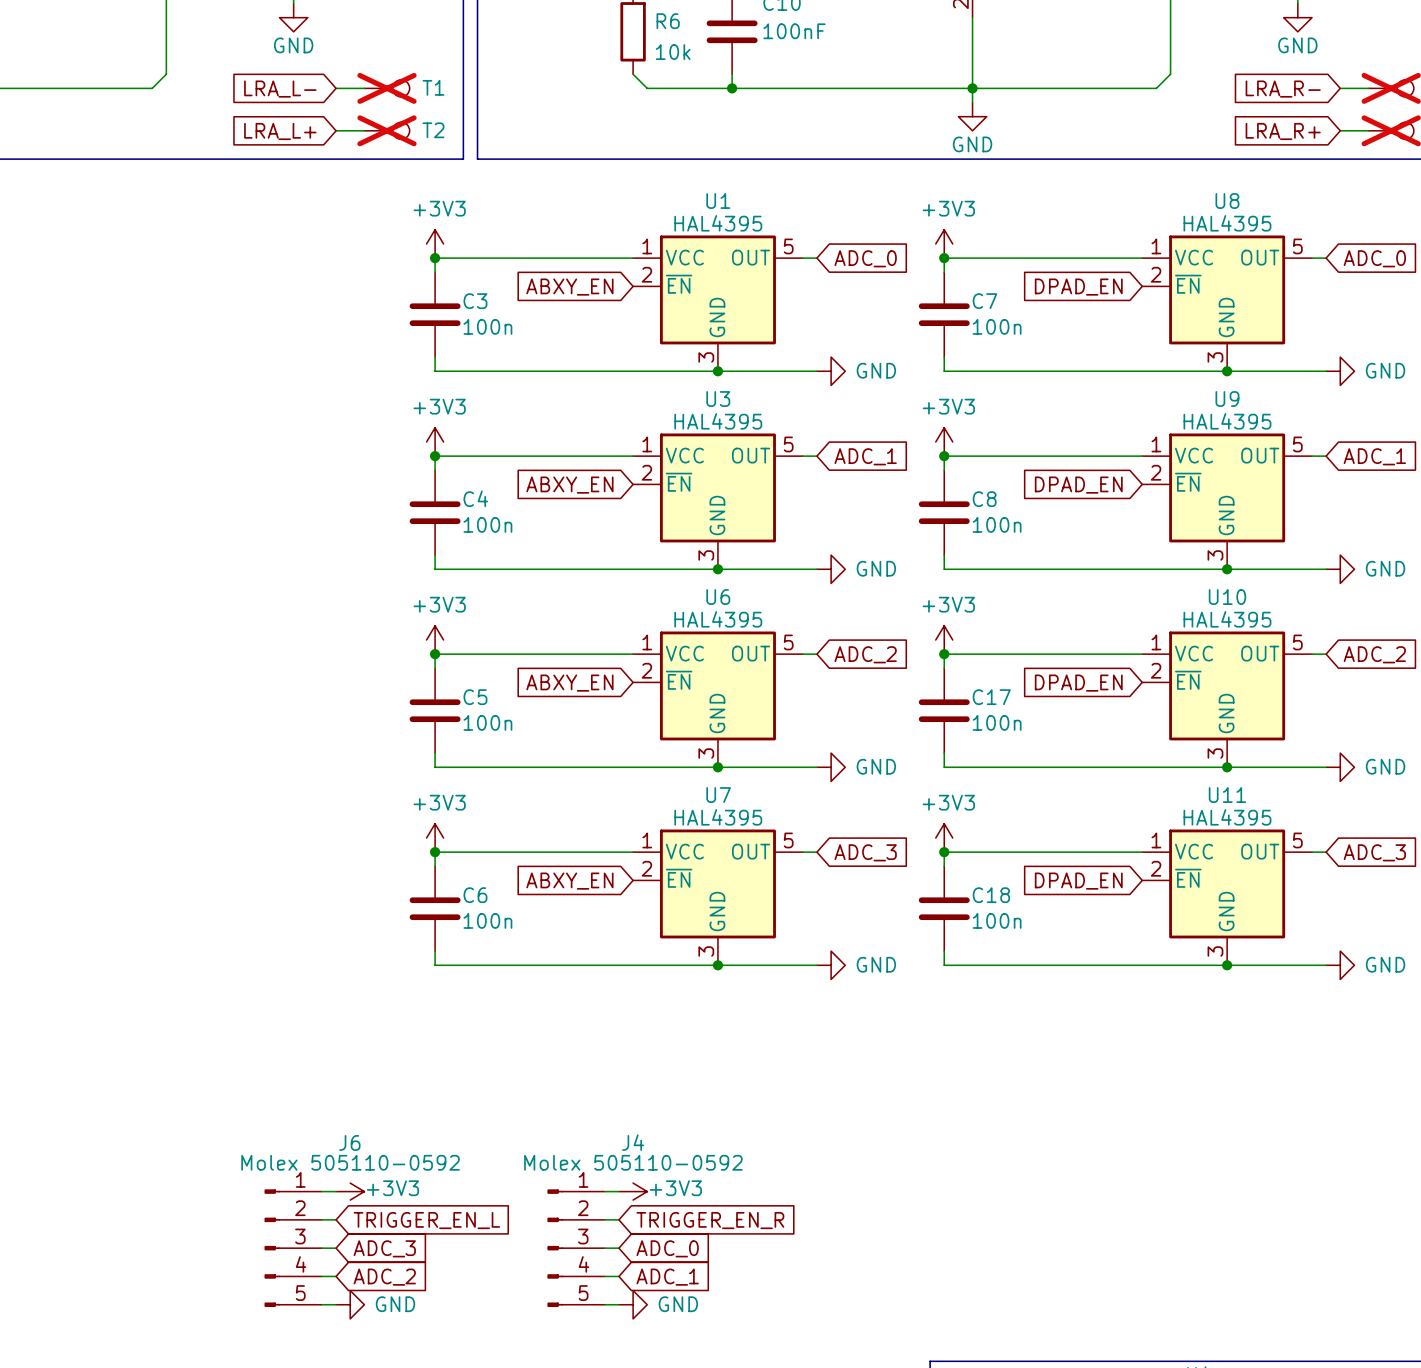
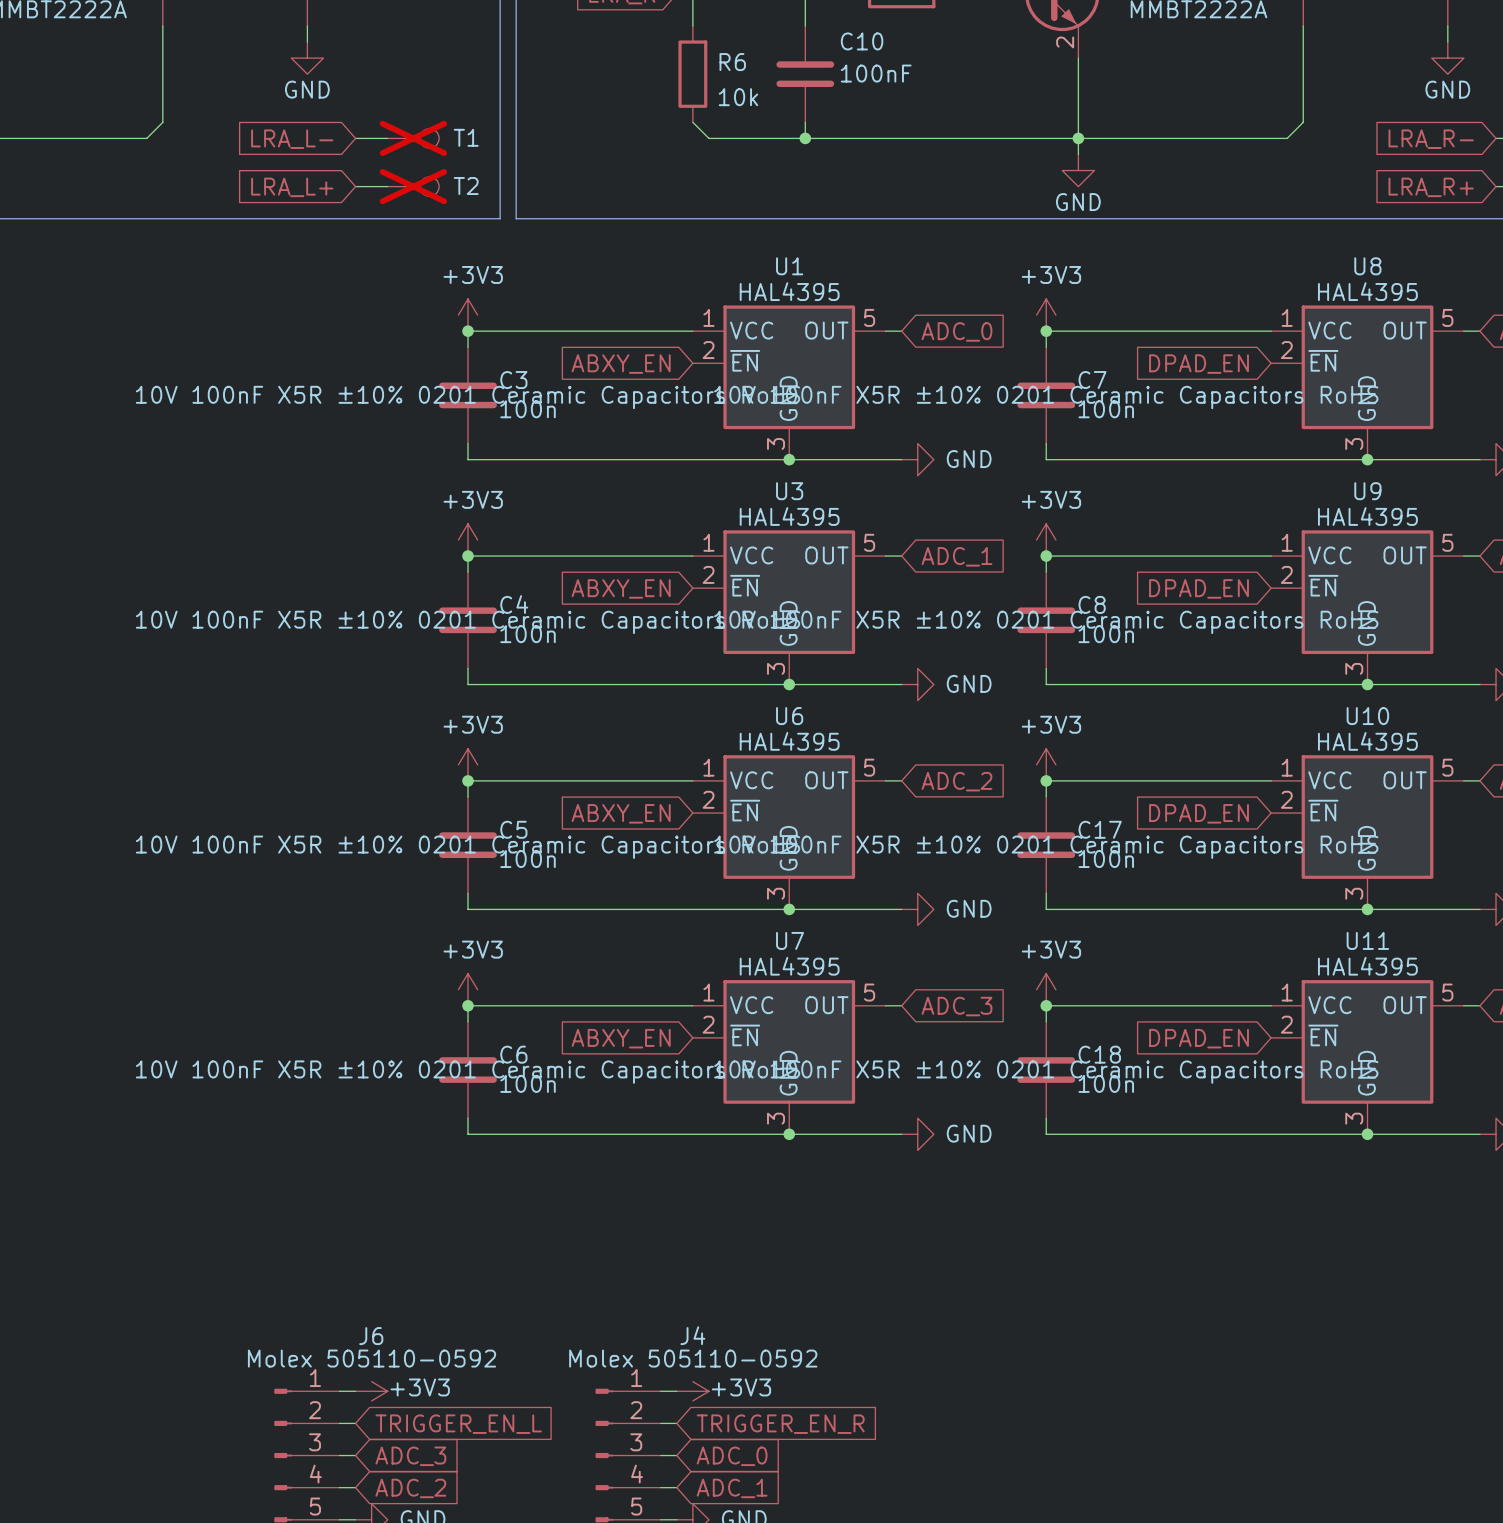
C3 text: none -> 10V 100nF X5R ±10% 0201 Ceramic Capacitors RoHS (468, 397)
C7 text: none -> 10V 100nF X5R ±10% 0201 Ceramic Capacitors RoHS (1046, 397)
C4 text: none -> 10V 100nF X5R ±10% 0201 Ceramic Capacitors RoHS (468, 622)
C8 text: none -> 10V 100nF X5R ±10% 0201 Ceramic Capacitors RoHS (1046, 622)
C5 text: none -> 10V 100nF X5R ±10% 0201 Ceramic Capacitors RoHS (468, 847)
C17 text: none -> 10V 100nF X5R ±10% 0201 Ceramic Capacitors RoHS (1046, 847)
C6 text: none -> 10V 100nF X5R ±10% 0201 Ceramic Capacitors RoHS (468, 1072)
C18 text: none -> 10V 100nF X5R ±10% 0201 Ceramic Capacitors RoHS (1046, 1072)

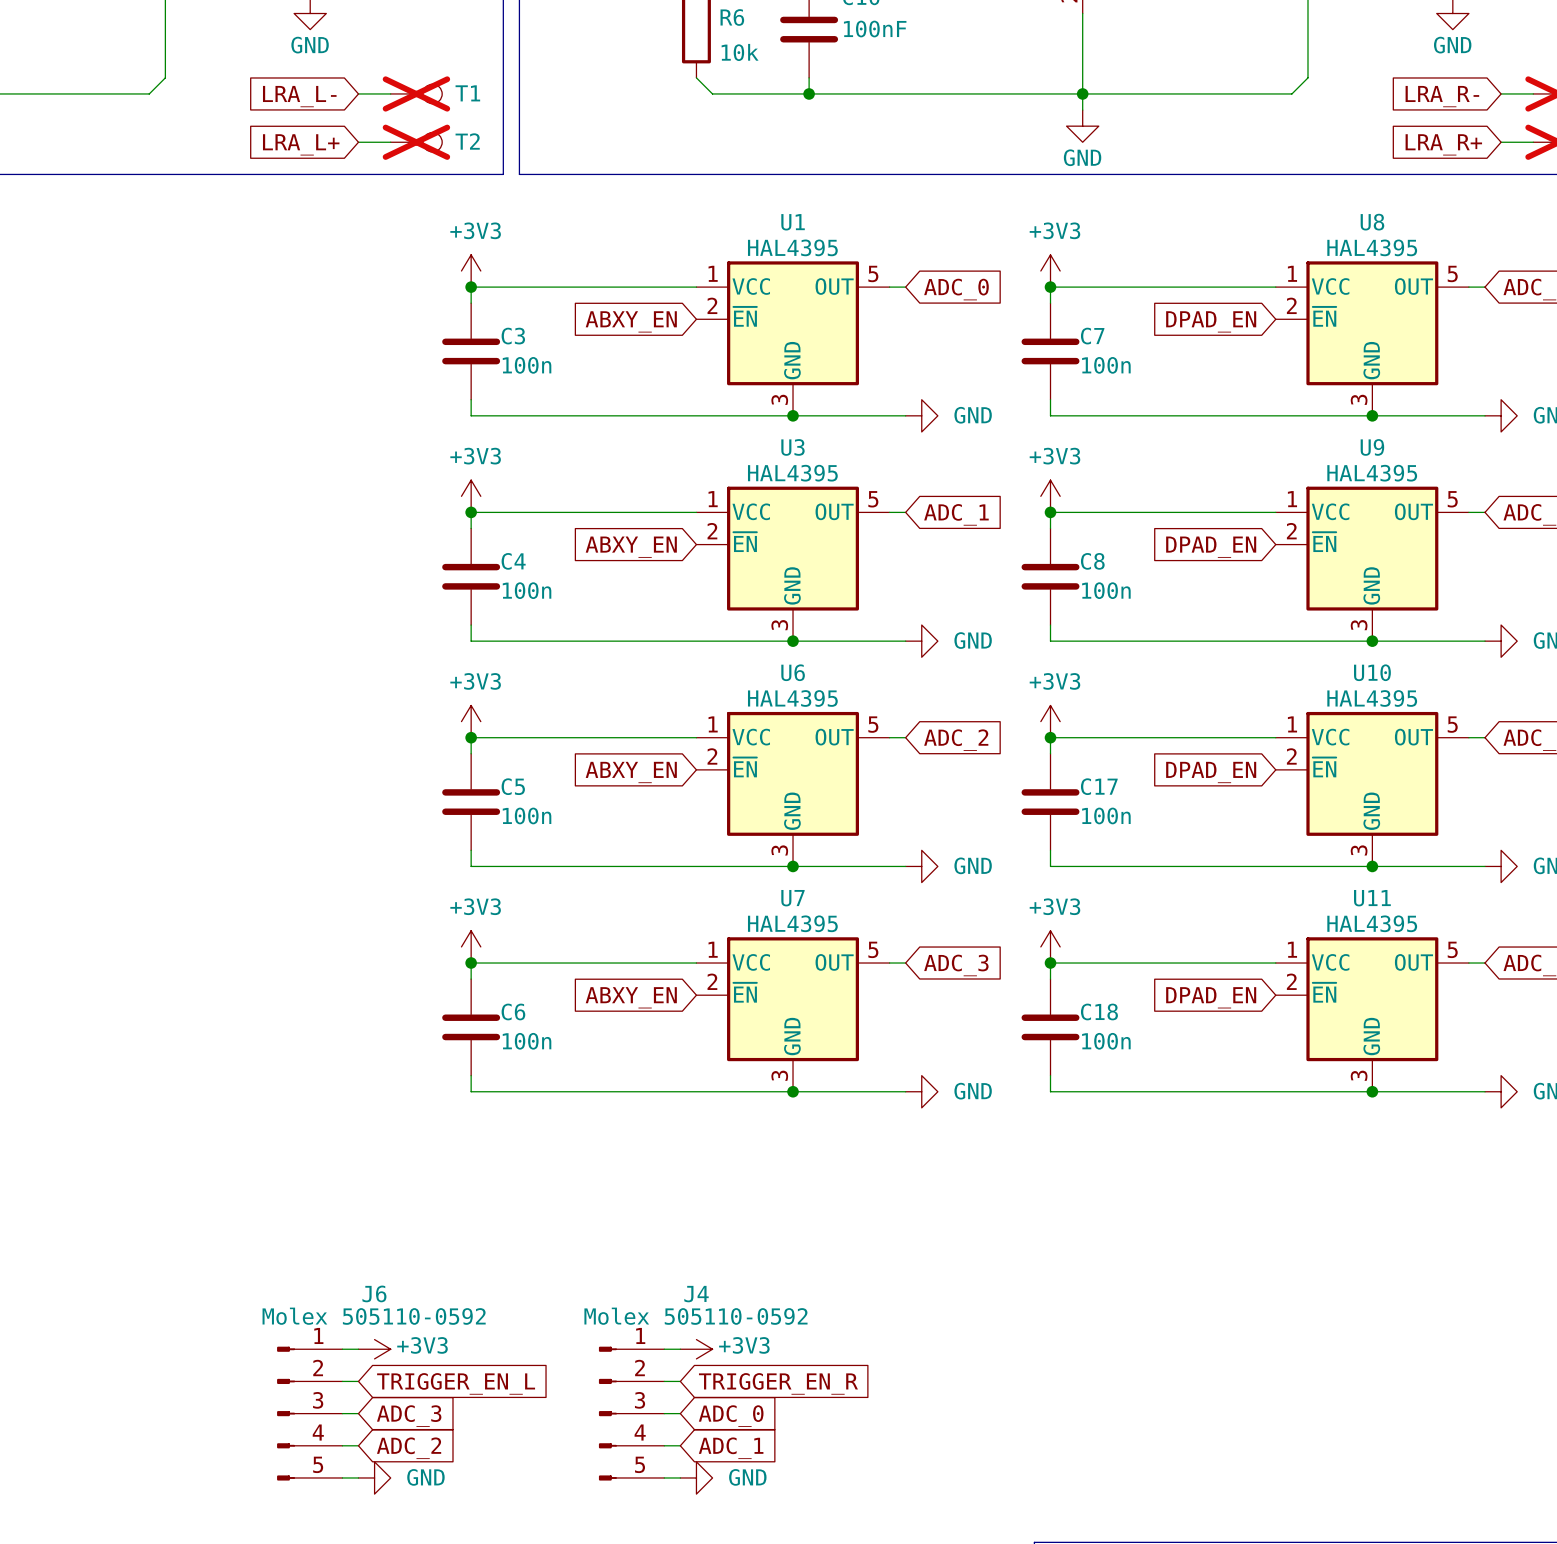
C3 text: 10V 100nF X5R ±10% 0201 Ceramic Capacitors RoHS (468, 397) -> none
C7 text: 10V 100nF X5R ±10% 0201 Ceramic Capacitors RoHS (1046, 397) -> none
C4 text: 10V 100nF X5R ±10% 0201 Ceramic Capacitors RoHS (468, 622) -> none
C8 text: 10V 100nF X5R ±10% 0201 Ceramic Capacitors RoHS (1046, 622) -> none
C5 text: 10V 100nF X5R ±10% 0201 Ceramic Capacitors RoHS (468, 847) -> none
C17 text: 10V 100nF X5R ±10% 0201 Ceramic Capacitors RoHS (1046, 847) -> none
C6 text: 10V 100nF X5R ±10% 0201 Ceramic Capacitors RoHS (468, 1072) -> none
C18 text: 10V 100nF X5R ±10% 0201 Ceramic Capacitors RoHS (1046, 1072) -> none

